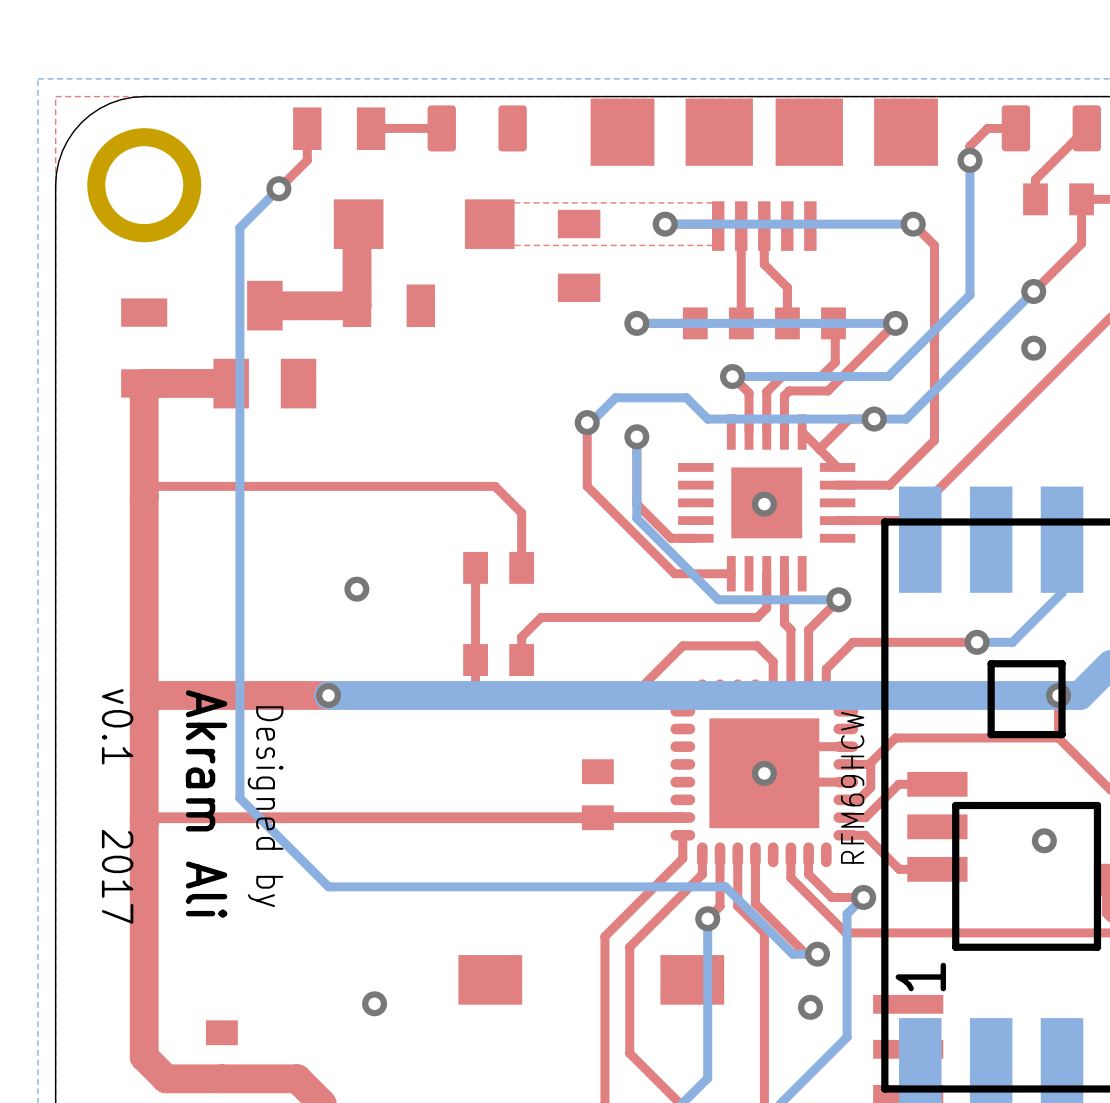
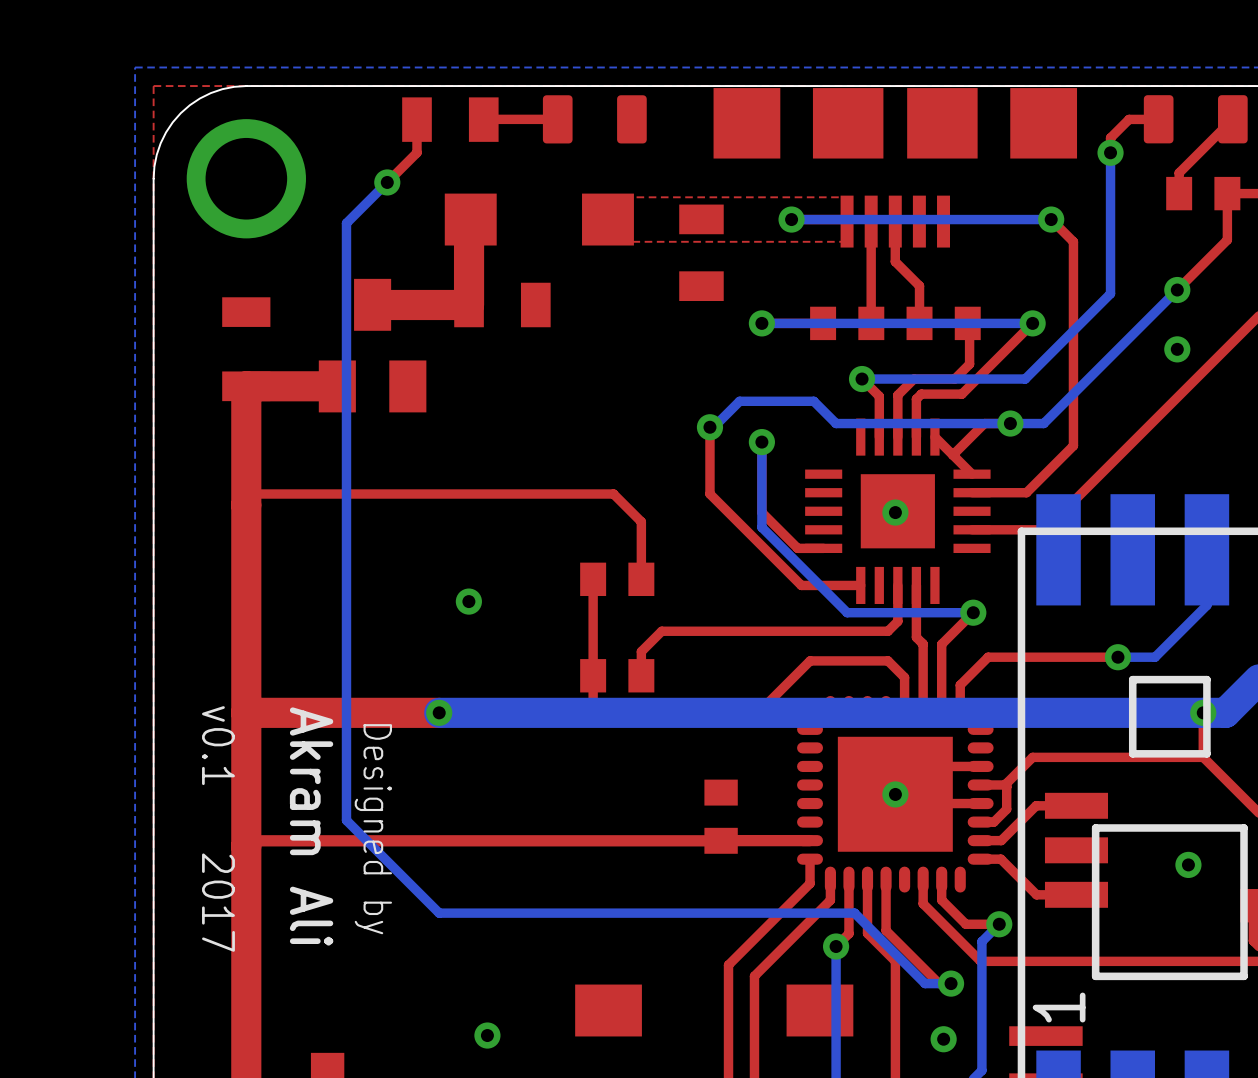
part value: RFM69HCW (852, 787) -> none

